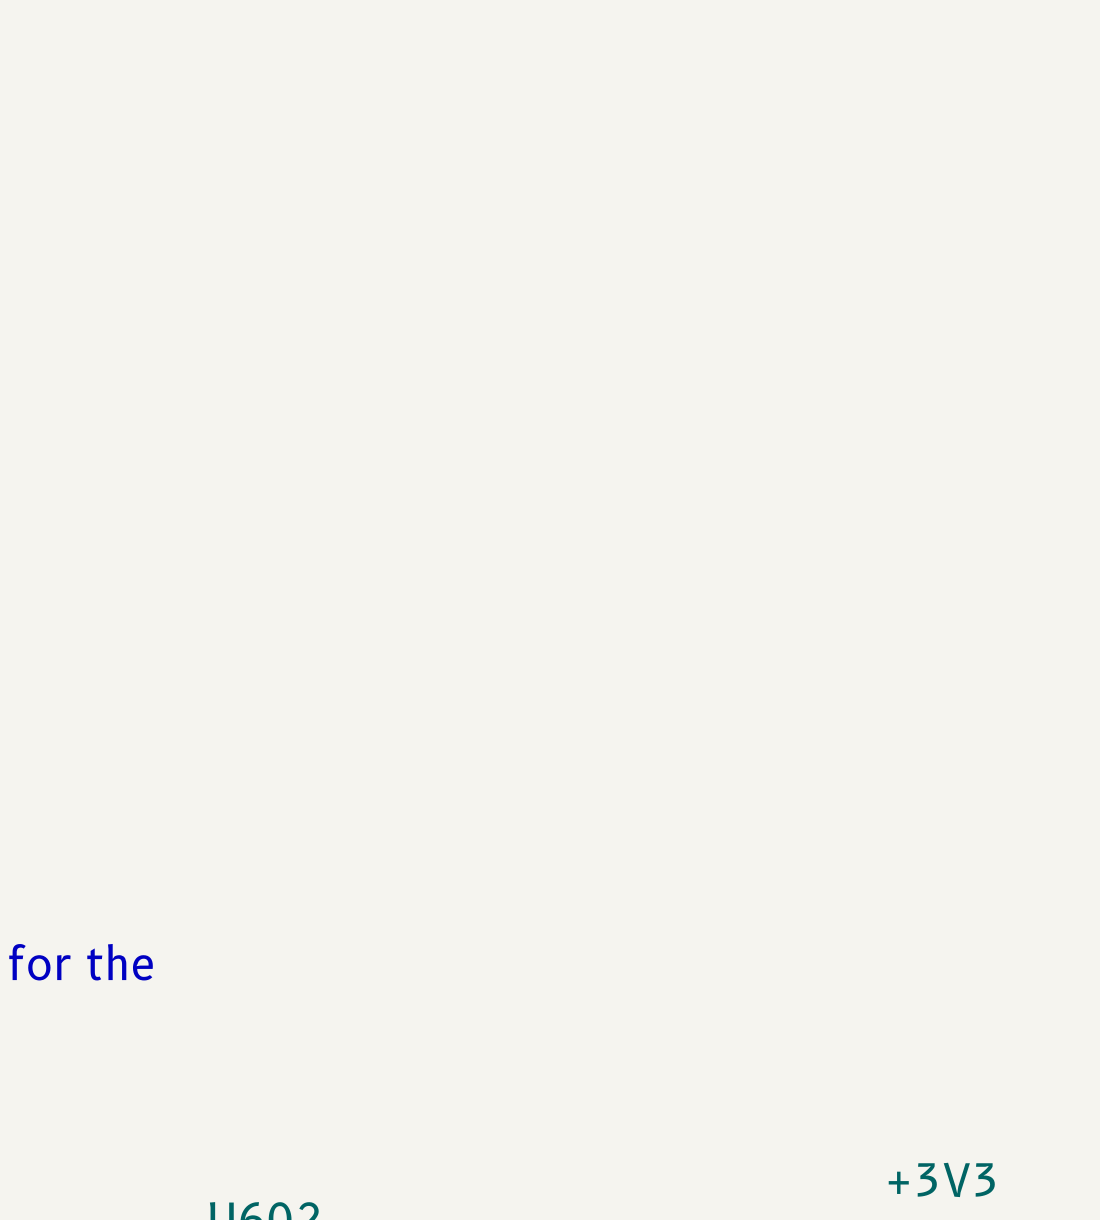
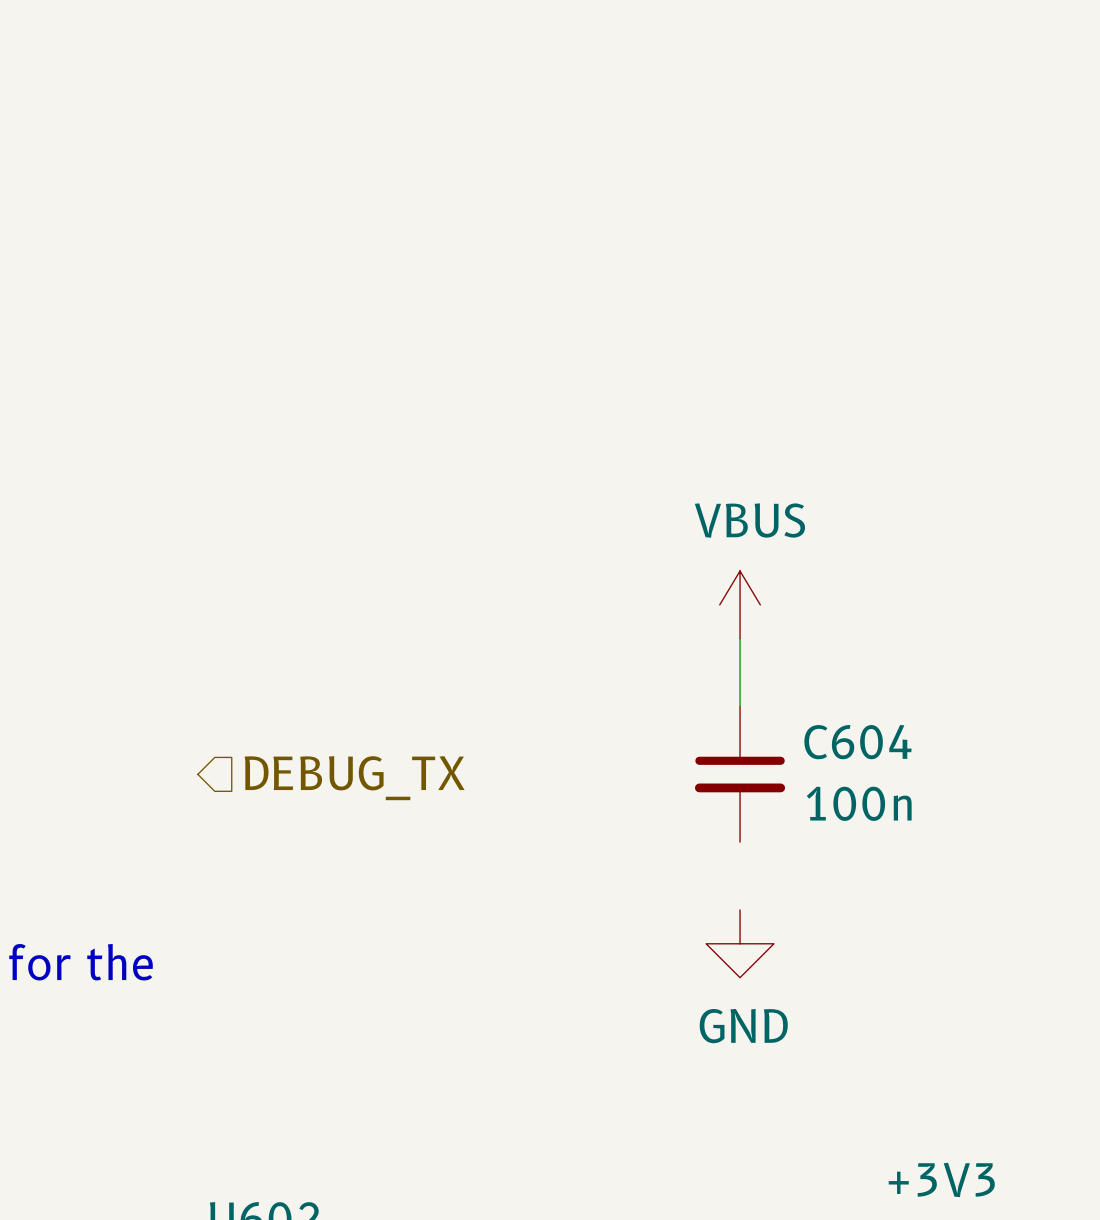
power symbol: none -> VBUS (740, 604)
wire: none -> (740, 638) (740, 706)
C604: none -> 100n (740, 774)
hierarchical label: none -> DEBUG_TX (354, 778)
power symbol: none -> GND (740, 943)

